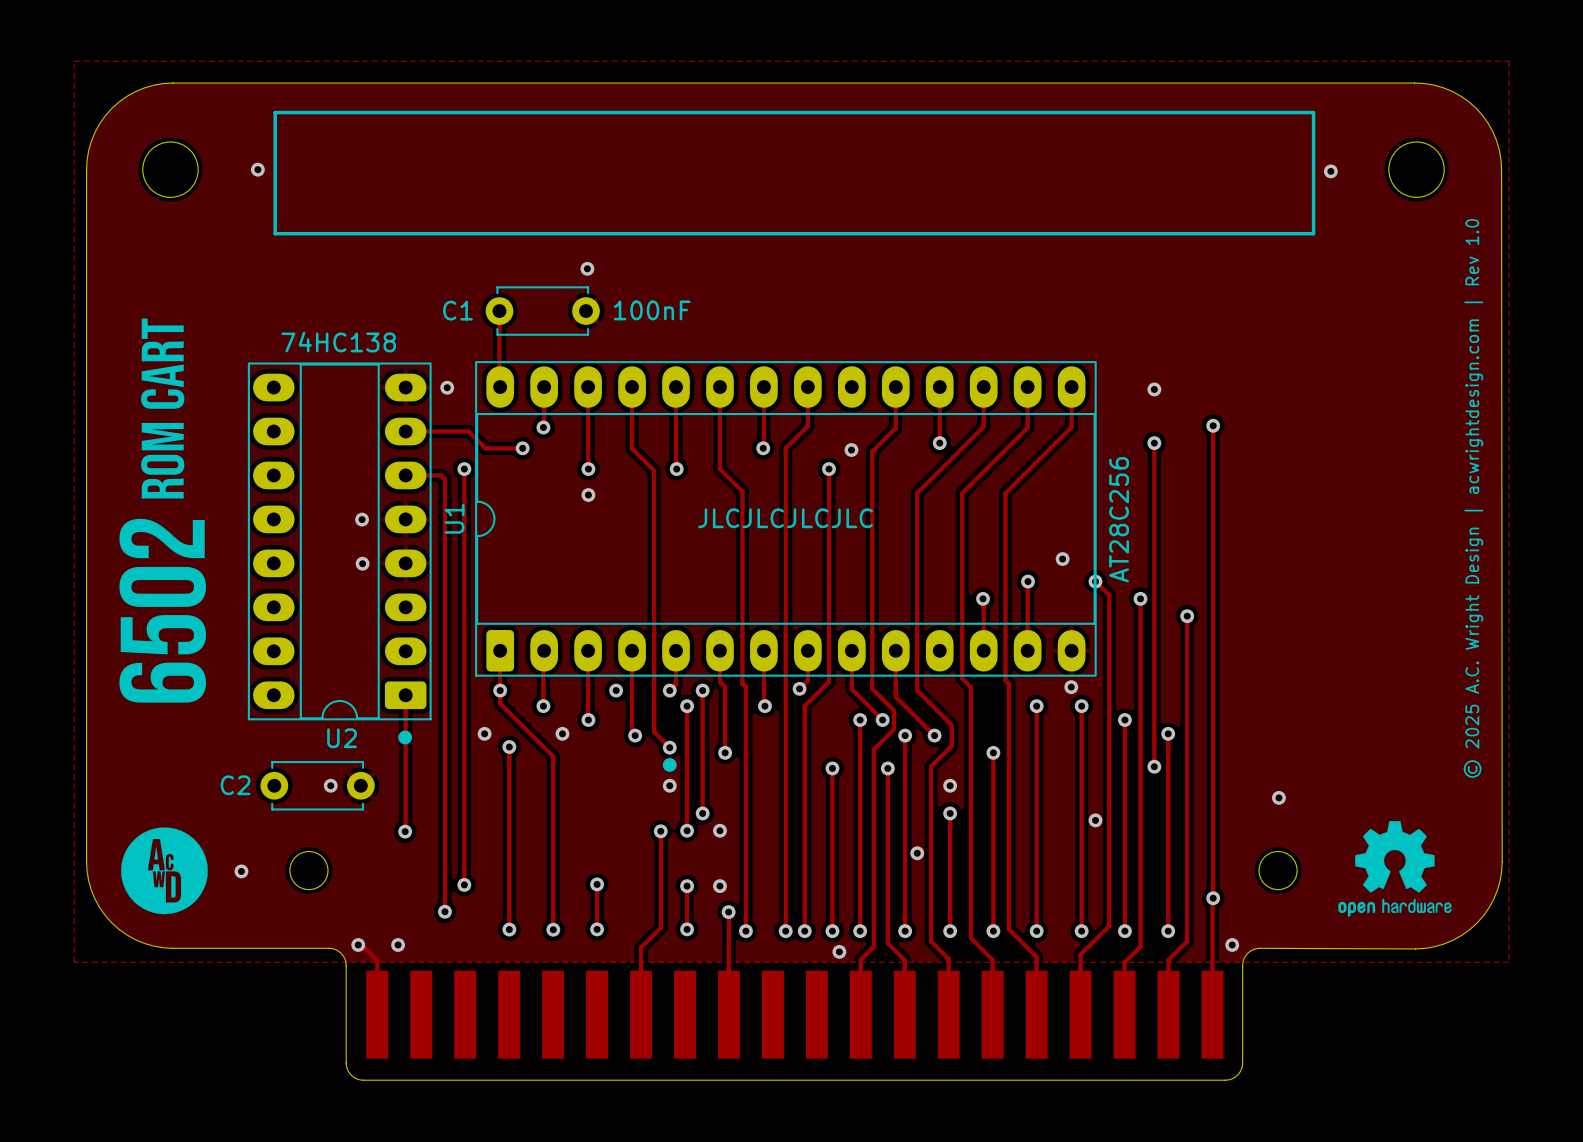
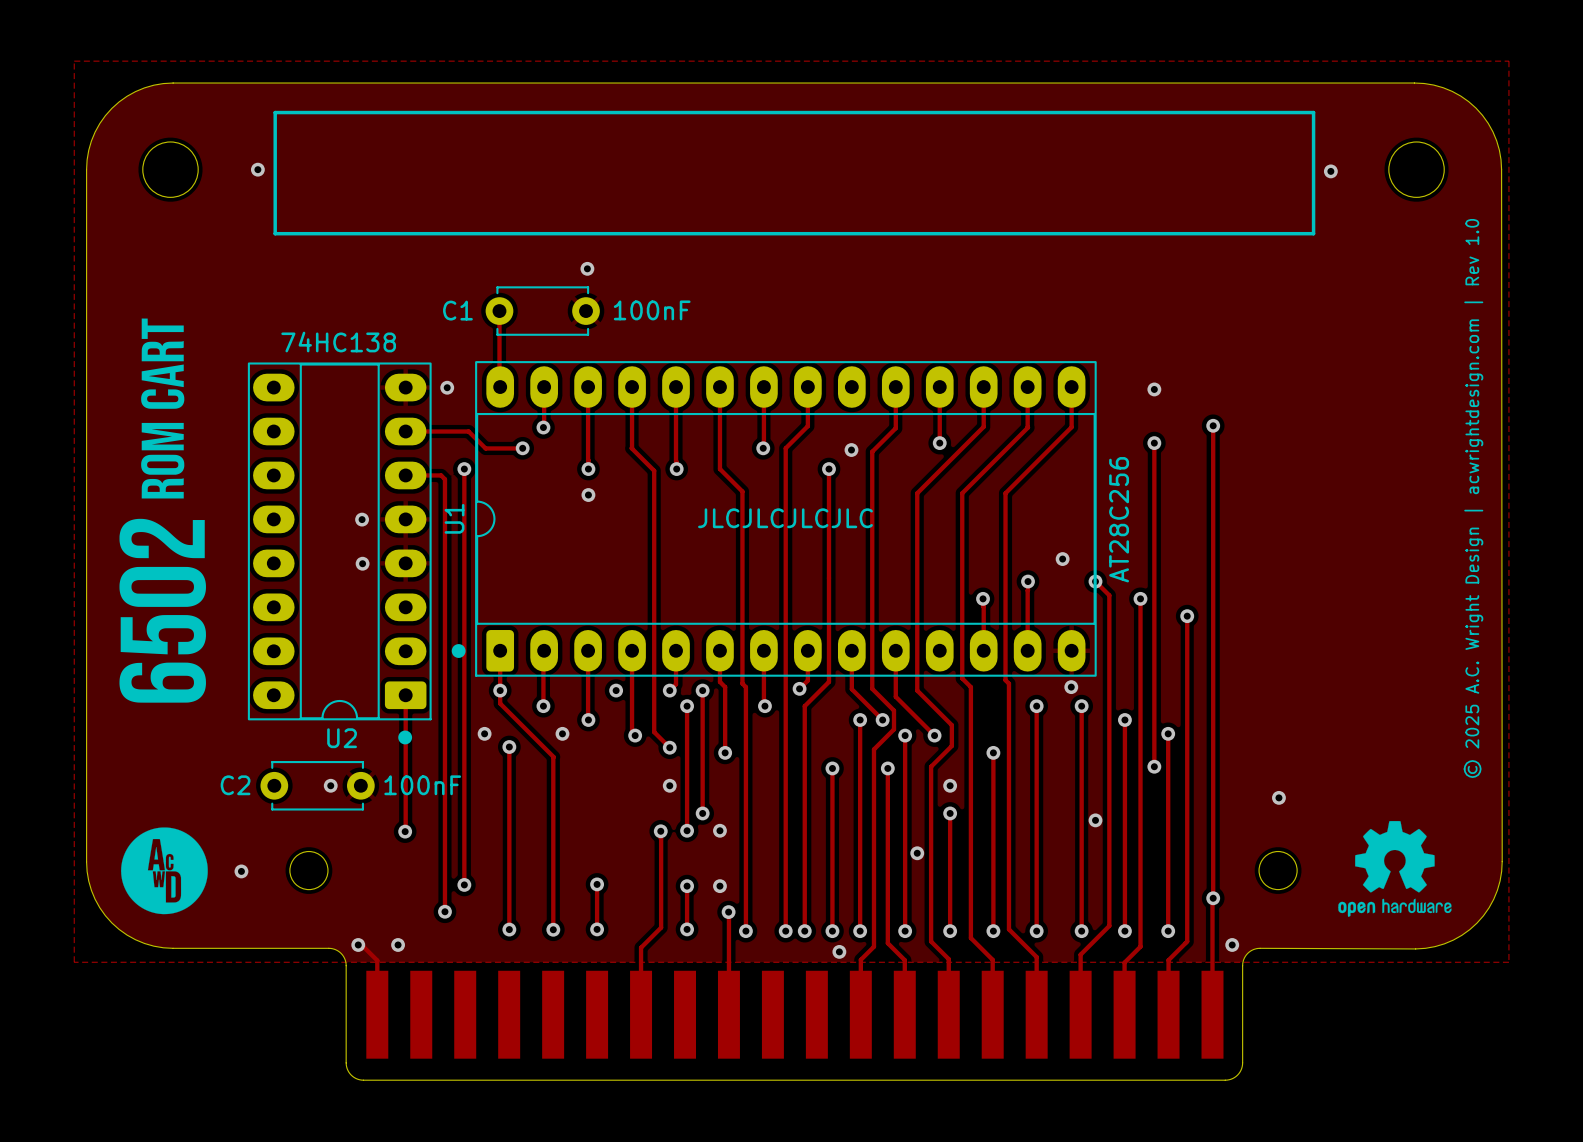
drawing position: (669, 764) -> (458, 651)
C2 value: none -> 100nF (422, 785)

